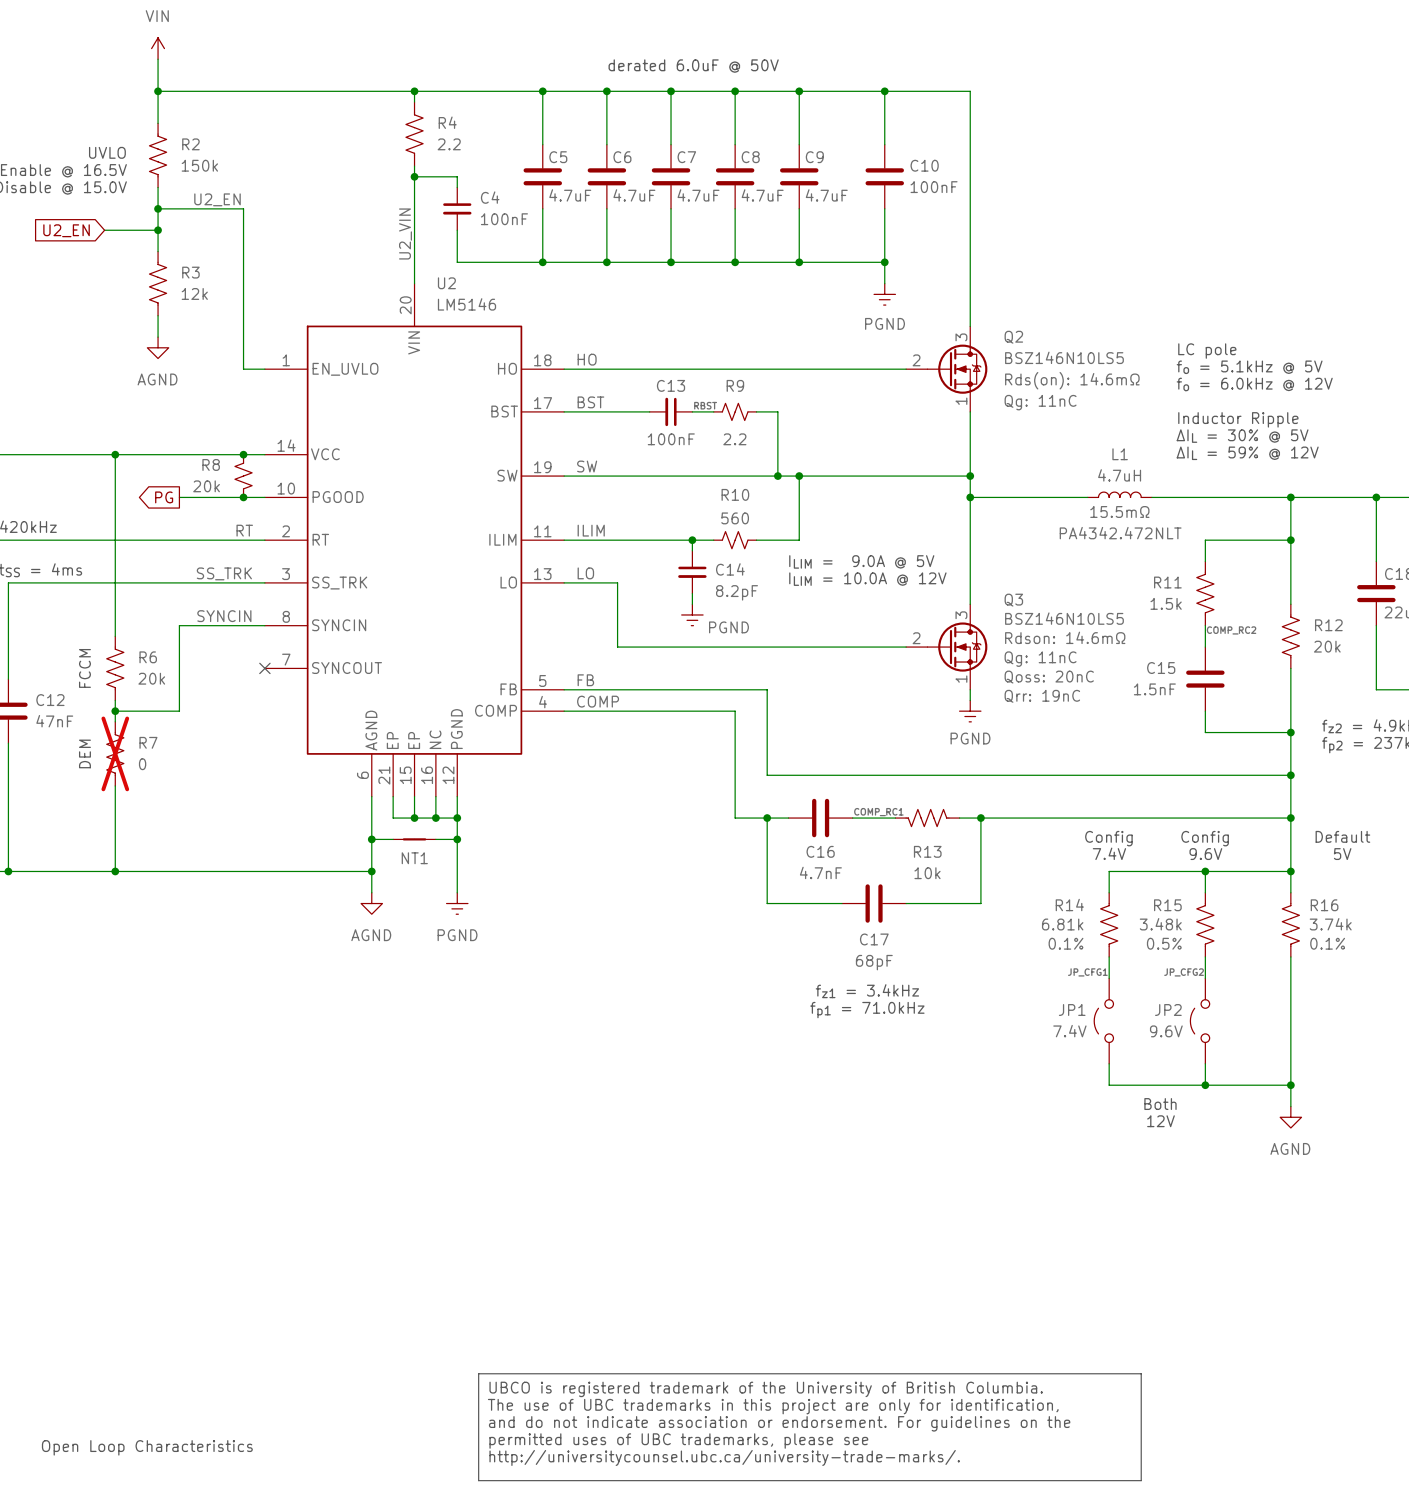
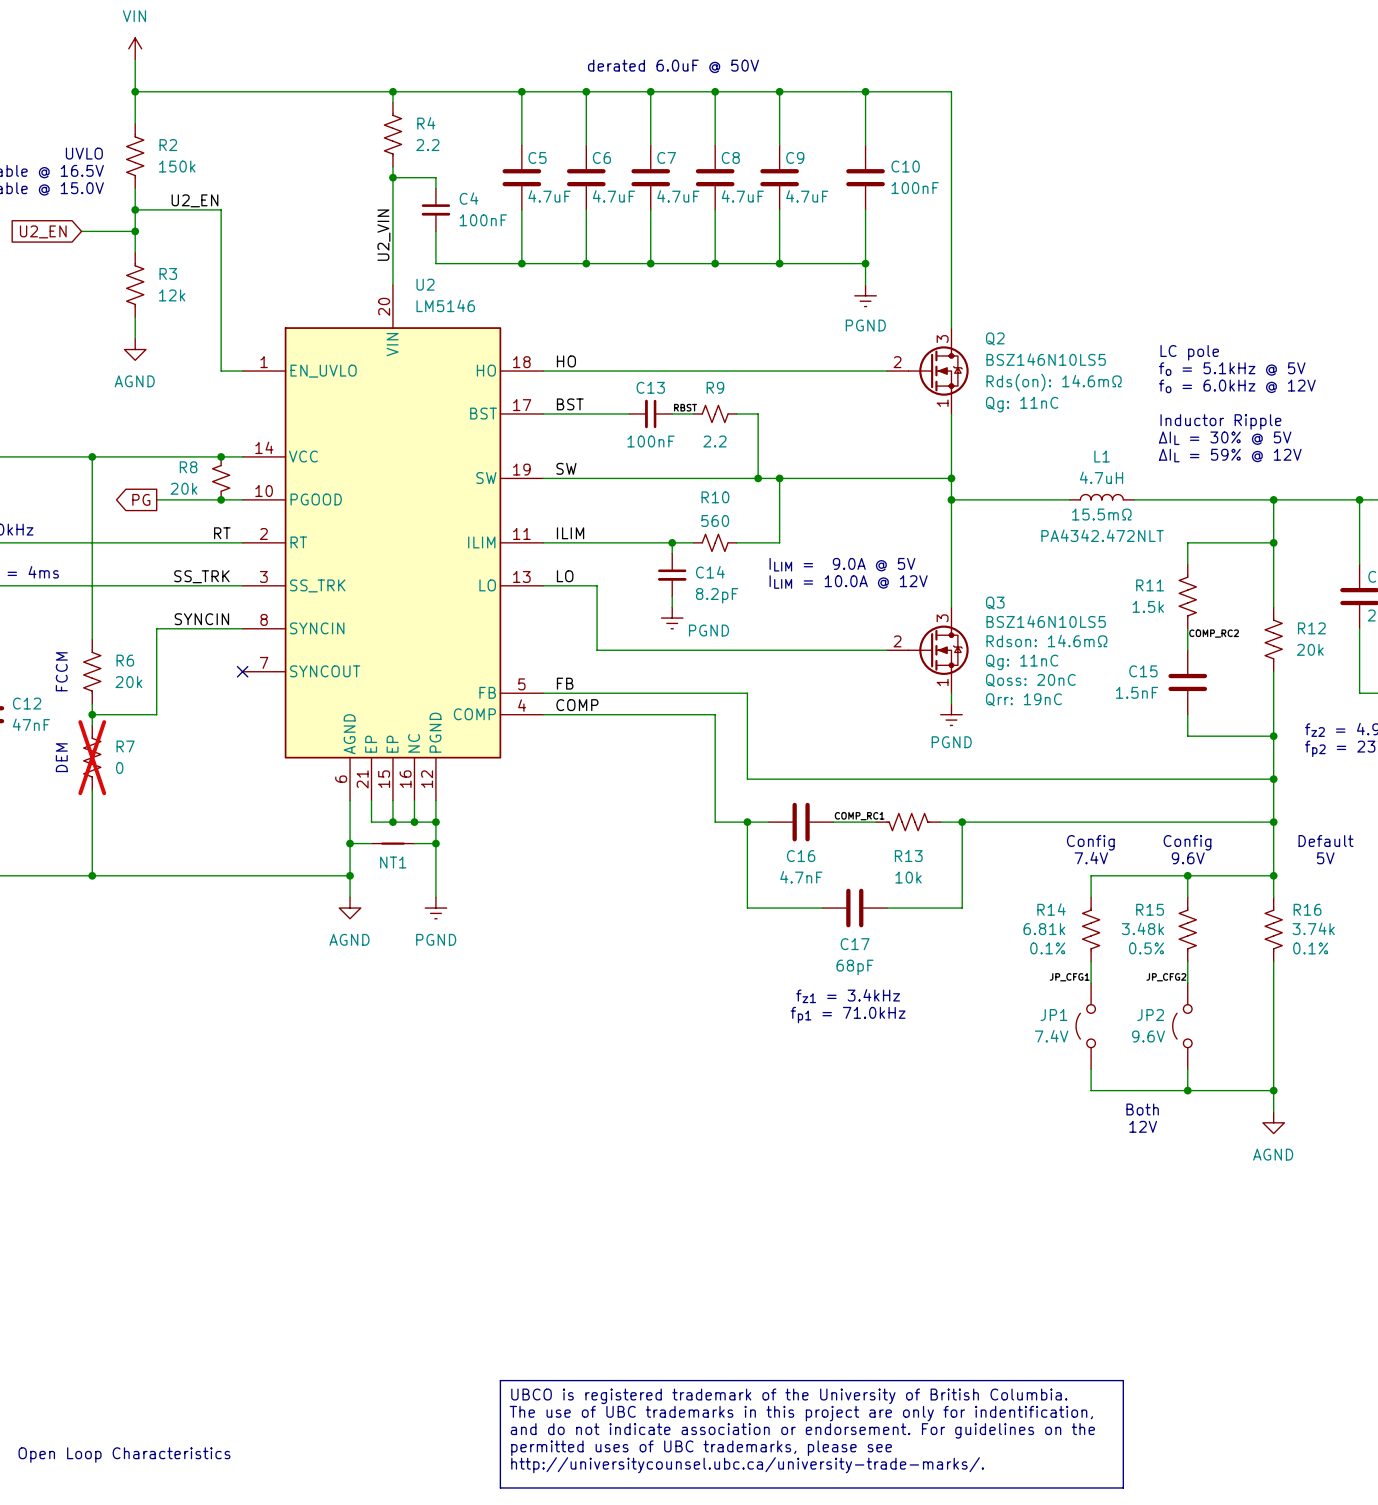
line: (521, 1373) (478, 1373) (478, 1480) (521, 1480) -> (500, 1380) (500, 1487)
text position: UBCO is registered trademark of the University of British Columbia. (766, 1389) -> UBCO is registered trademark of the University of British Columbia. (789, 1396)
text: The use of UBC trademarks in this project are only for identification, (773, 1406) -> The use of UBC trademarks in this project are only for indentification, (801, 1413)
text position: and do not indicate association or endorsement. For guidelines on the (779, 1423) -> and do not indicate association or endorsement. For guidelines on the (802, 1430)
text position: permitted uses of UBC trademarks, please see (678, 1441) -> permitted uses of UBC trademarks, please see (701, 1448)
text position: http://universitycounsel.ubc.ca/university-trade-marks/. (724, 1457) -> http://universitycounsel.ubc.ca/university-trade-marks/. (747, 1465)

